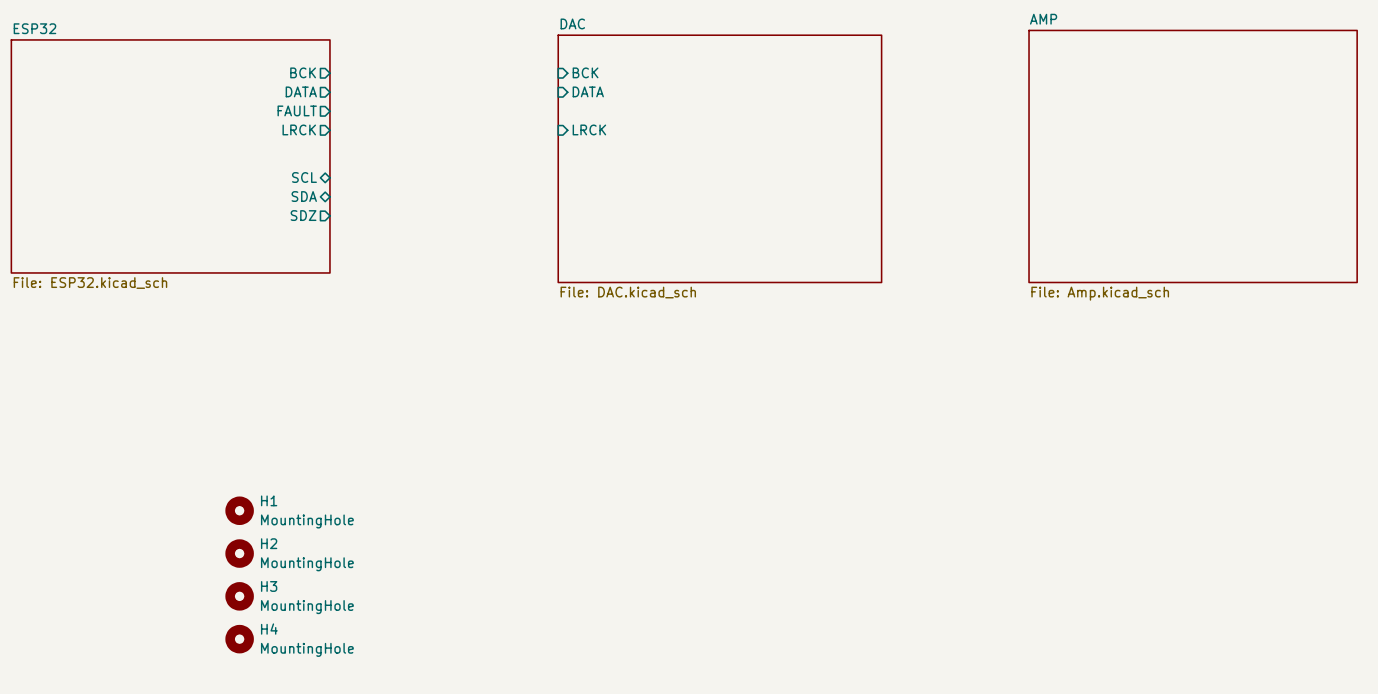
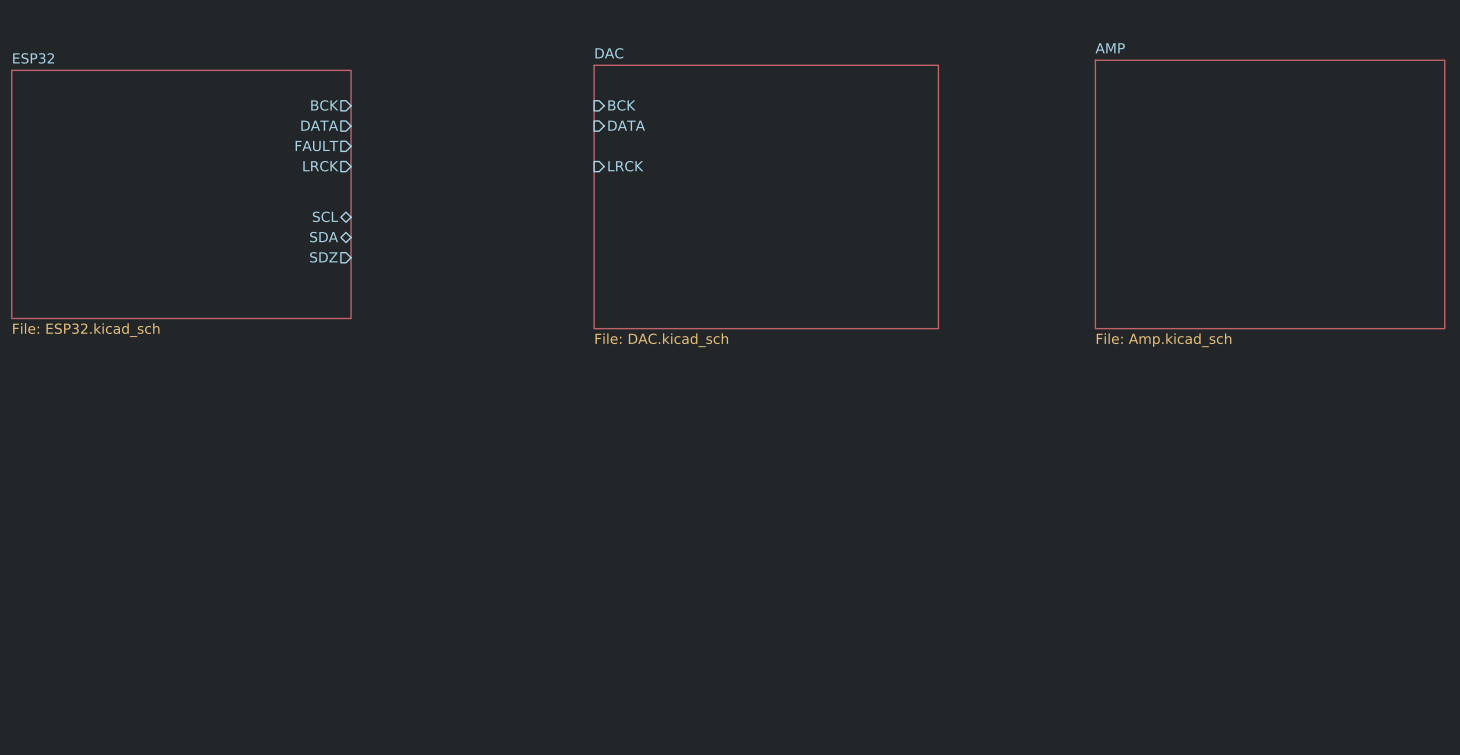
H1: MountingHole (239, 510) -> none
H2: MountingHole (239, 553) -> none
H3: MountingHole (239, 596) -> none
H4: MountingHole (239, 639) -> none

